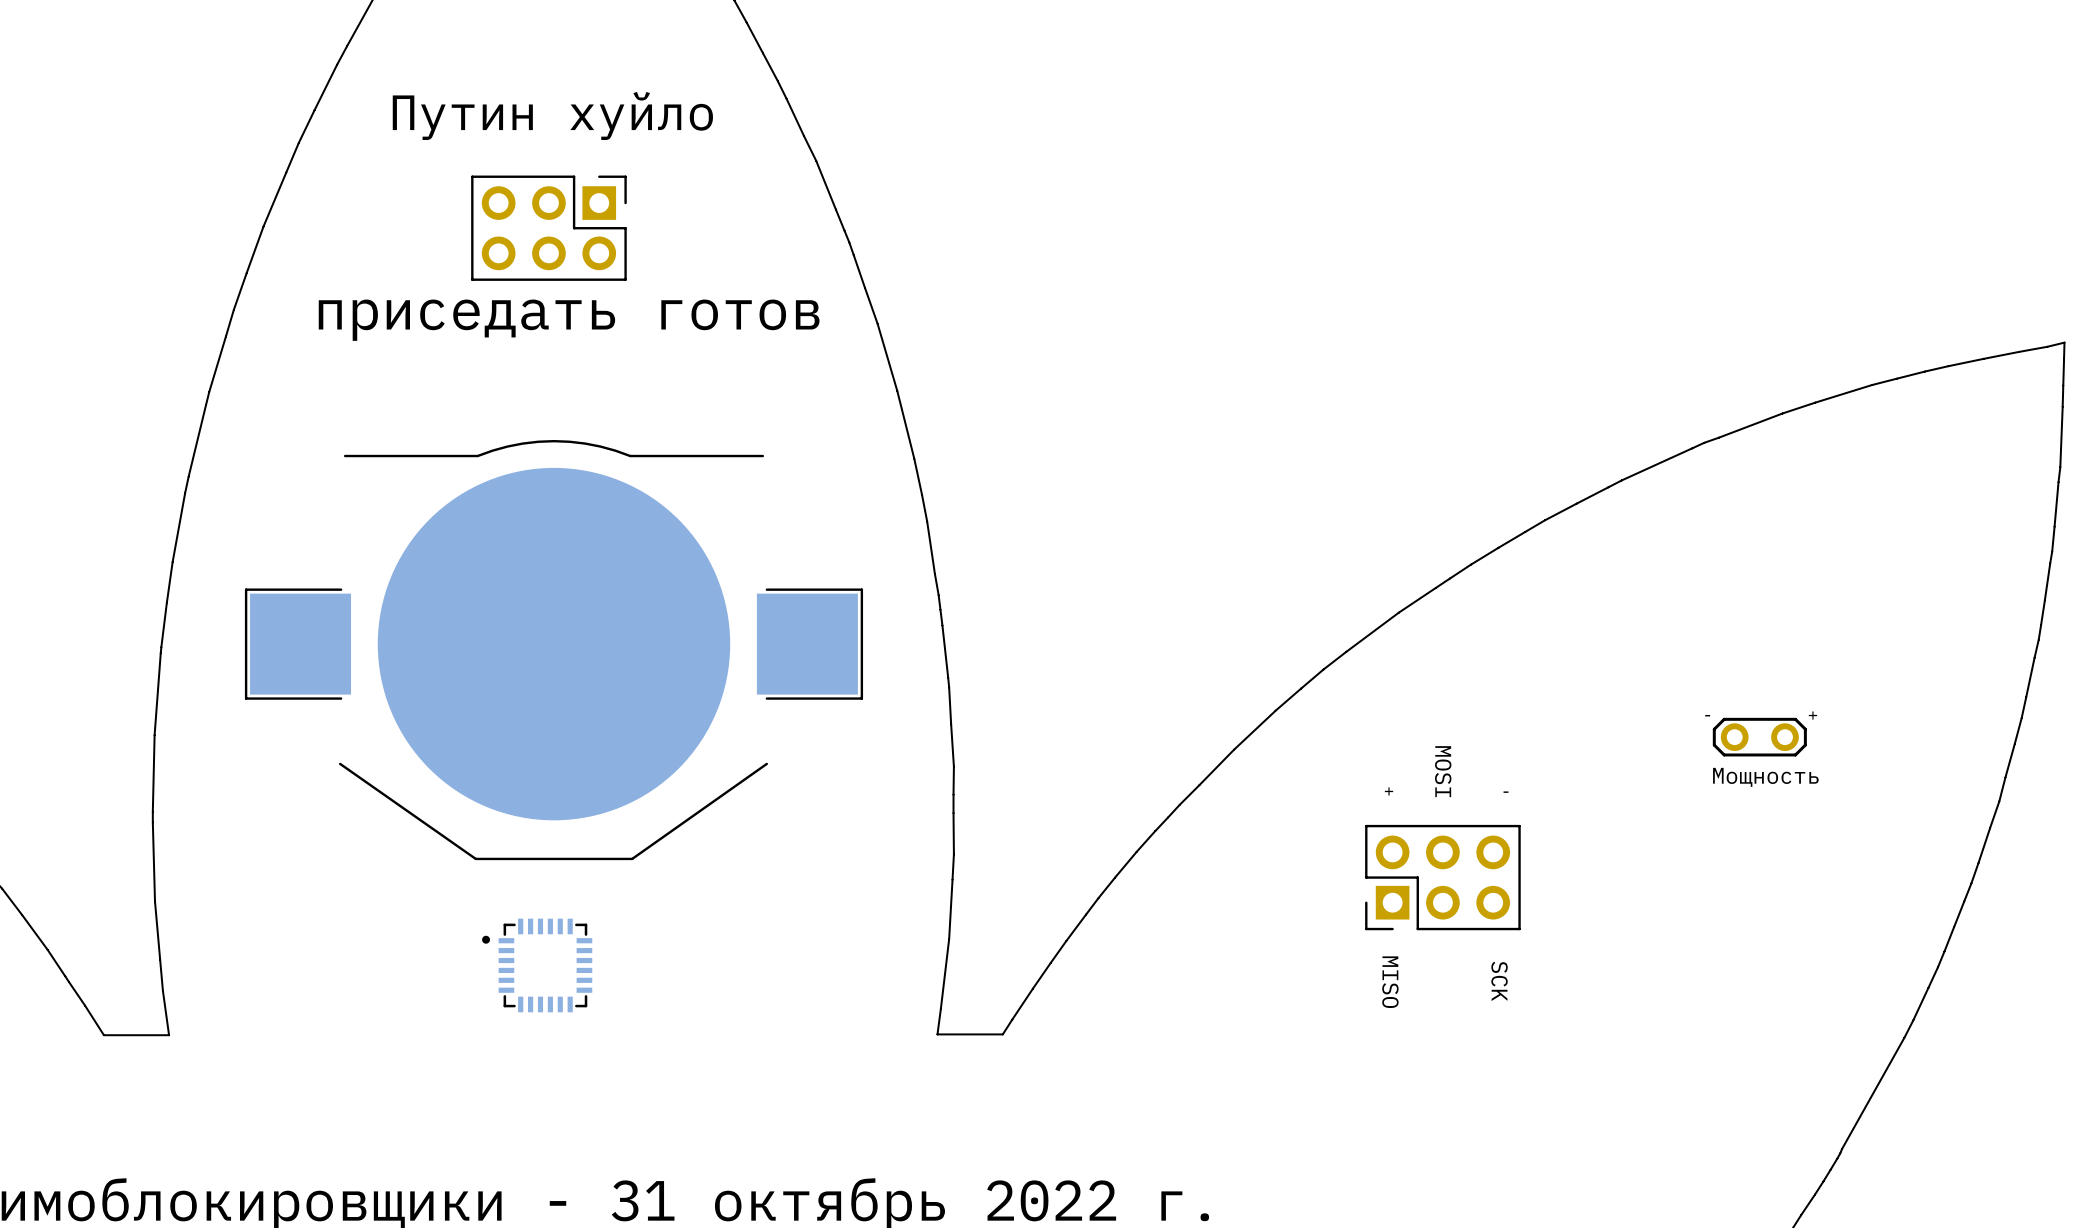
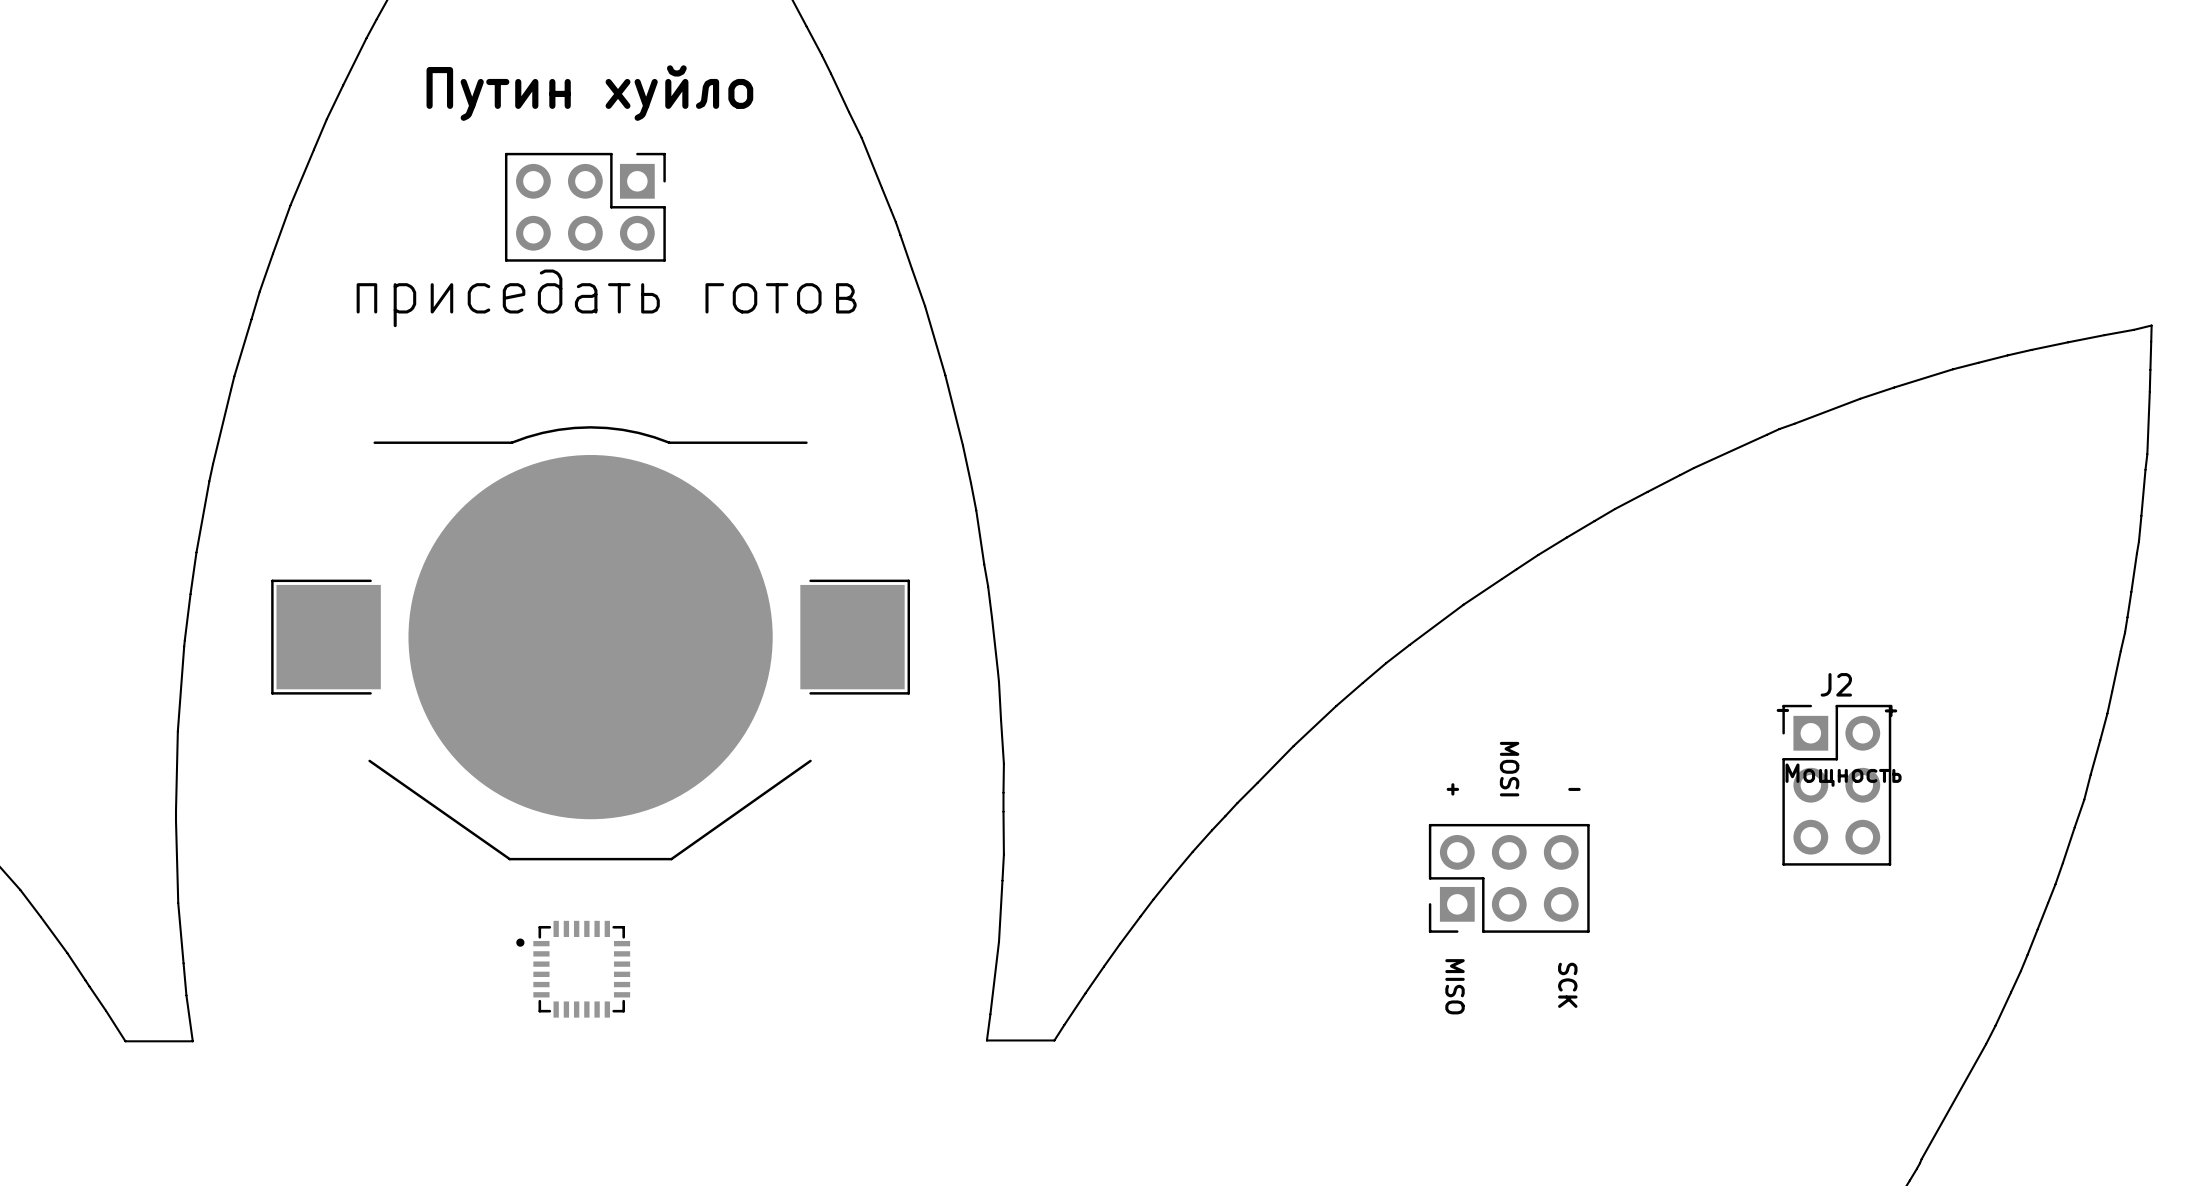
part: (1759, 737) -> none
J2: none -> (1836, 785)

